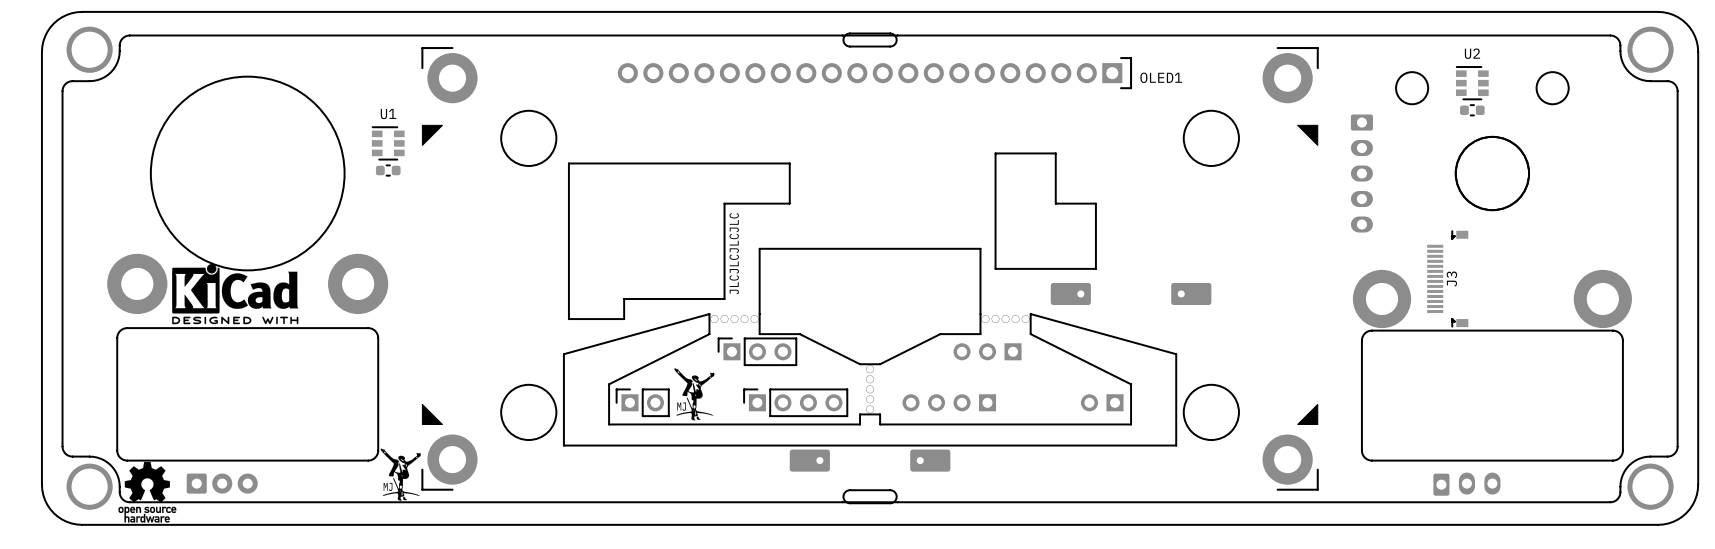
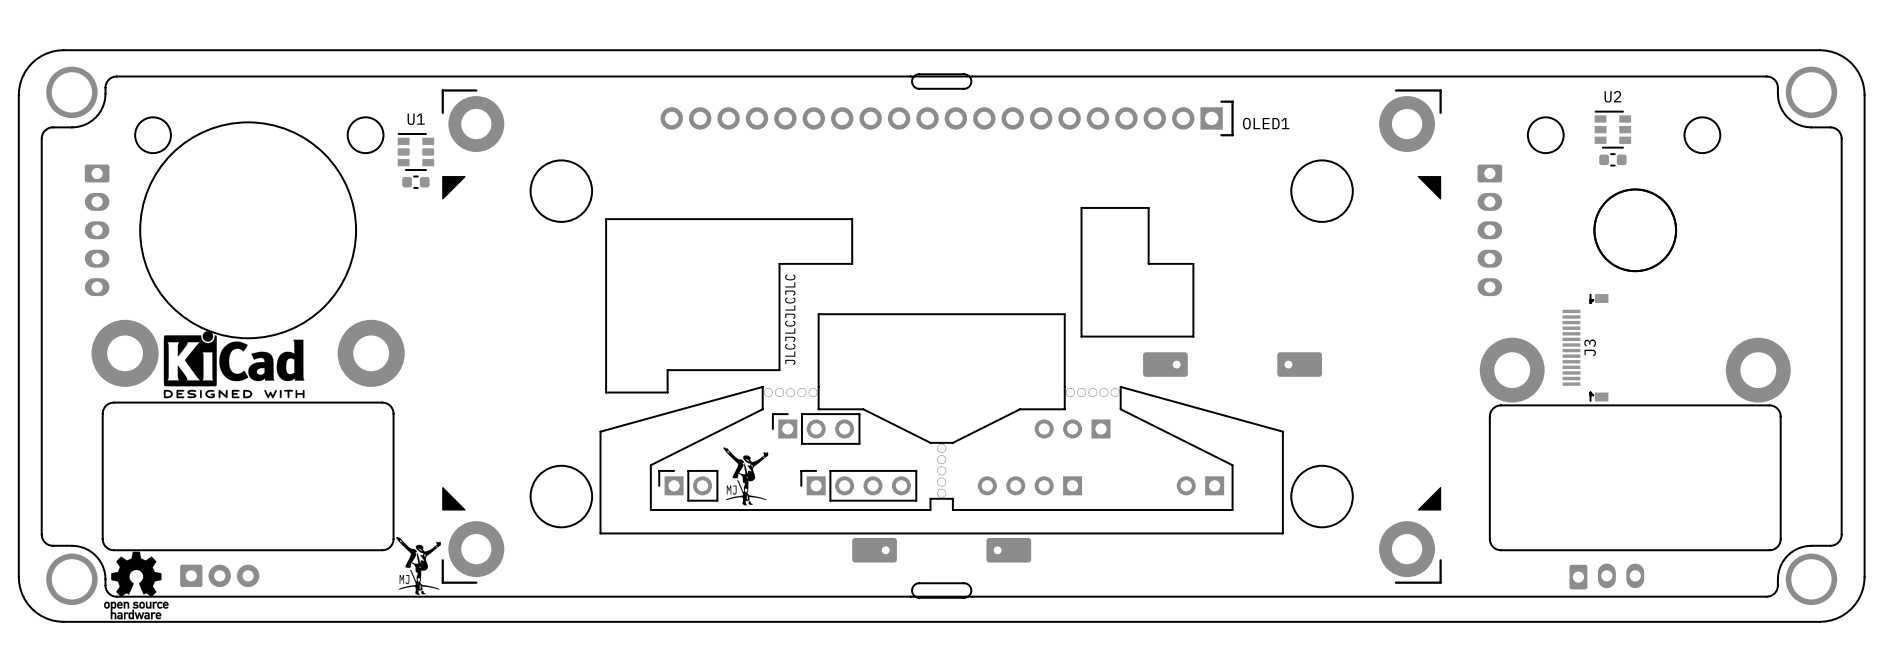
part footprint: [107, 76, 389, 494] -> [84, 117, 405, 588]
U1 position: (388, 143) -> (415, 152)
part position: (388, 170) -> (415, 182)

